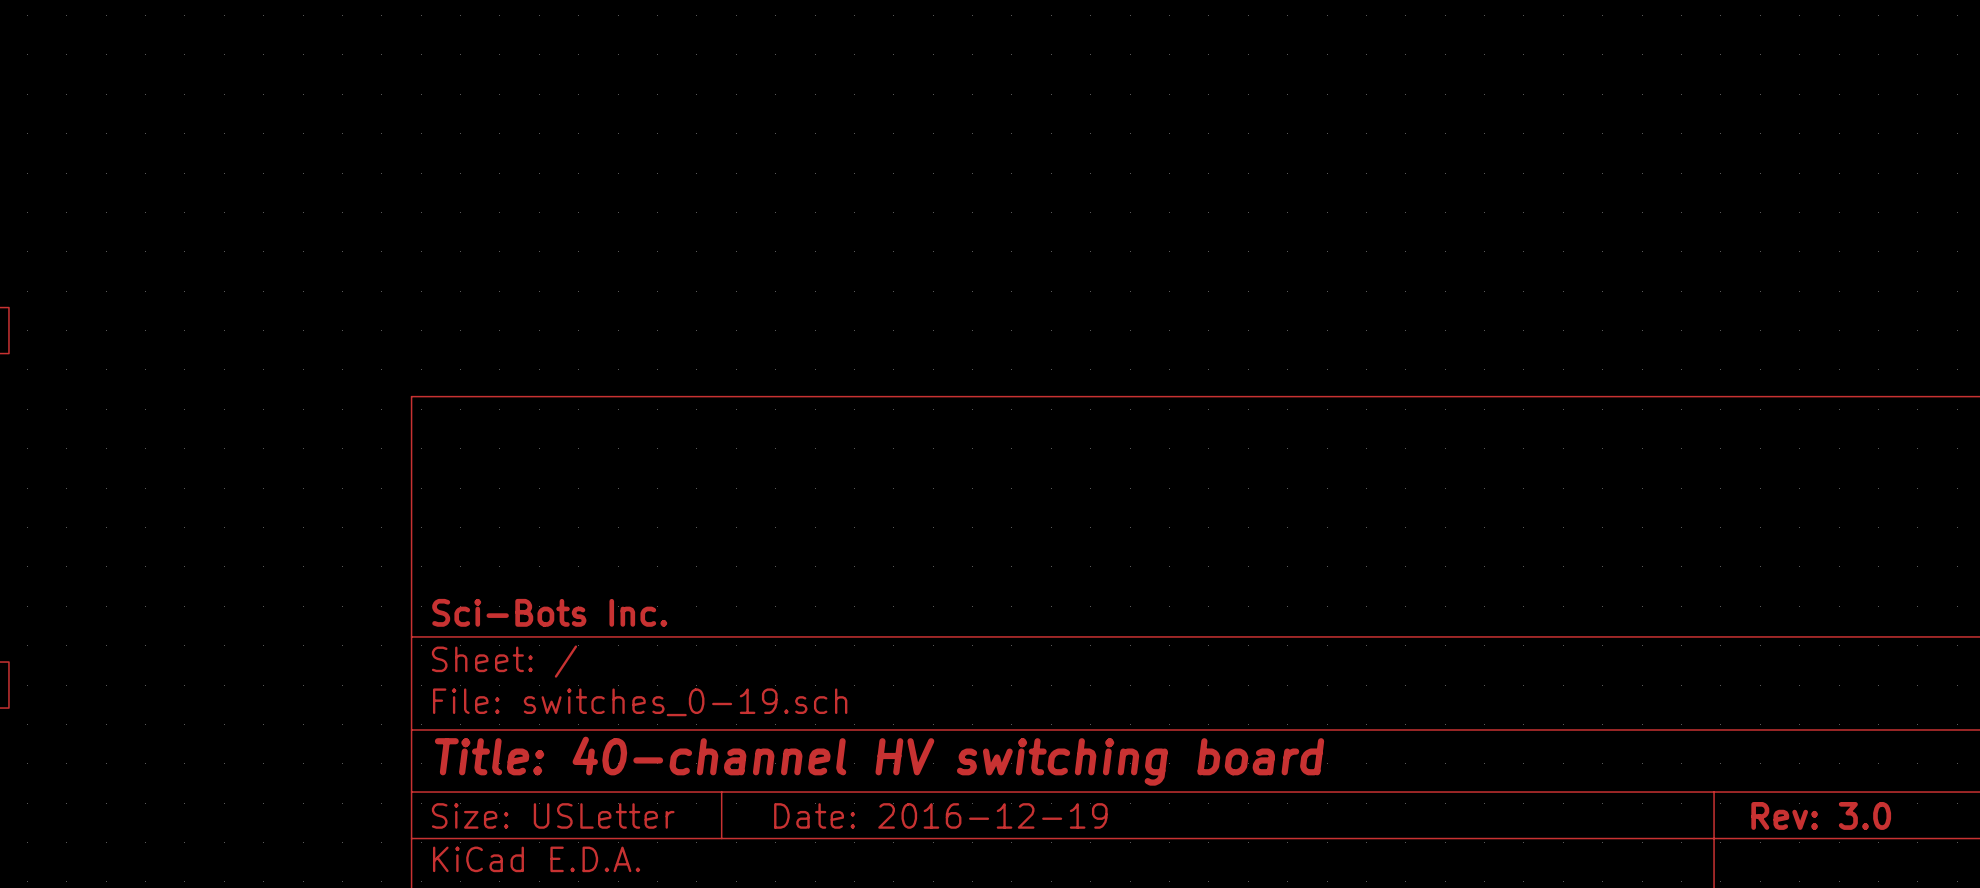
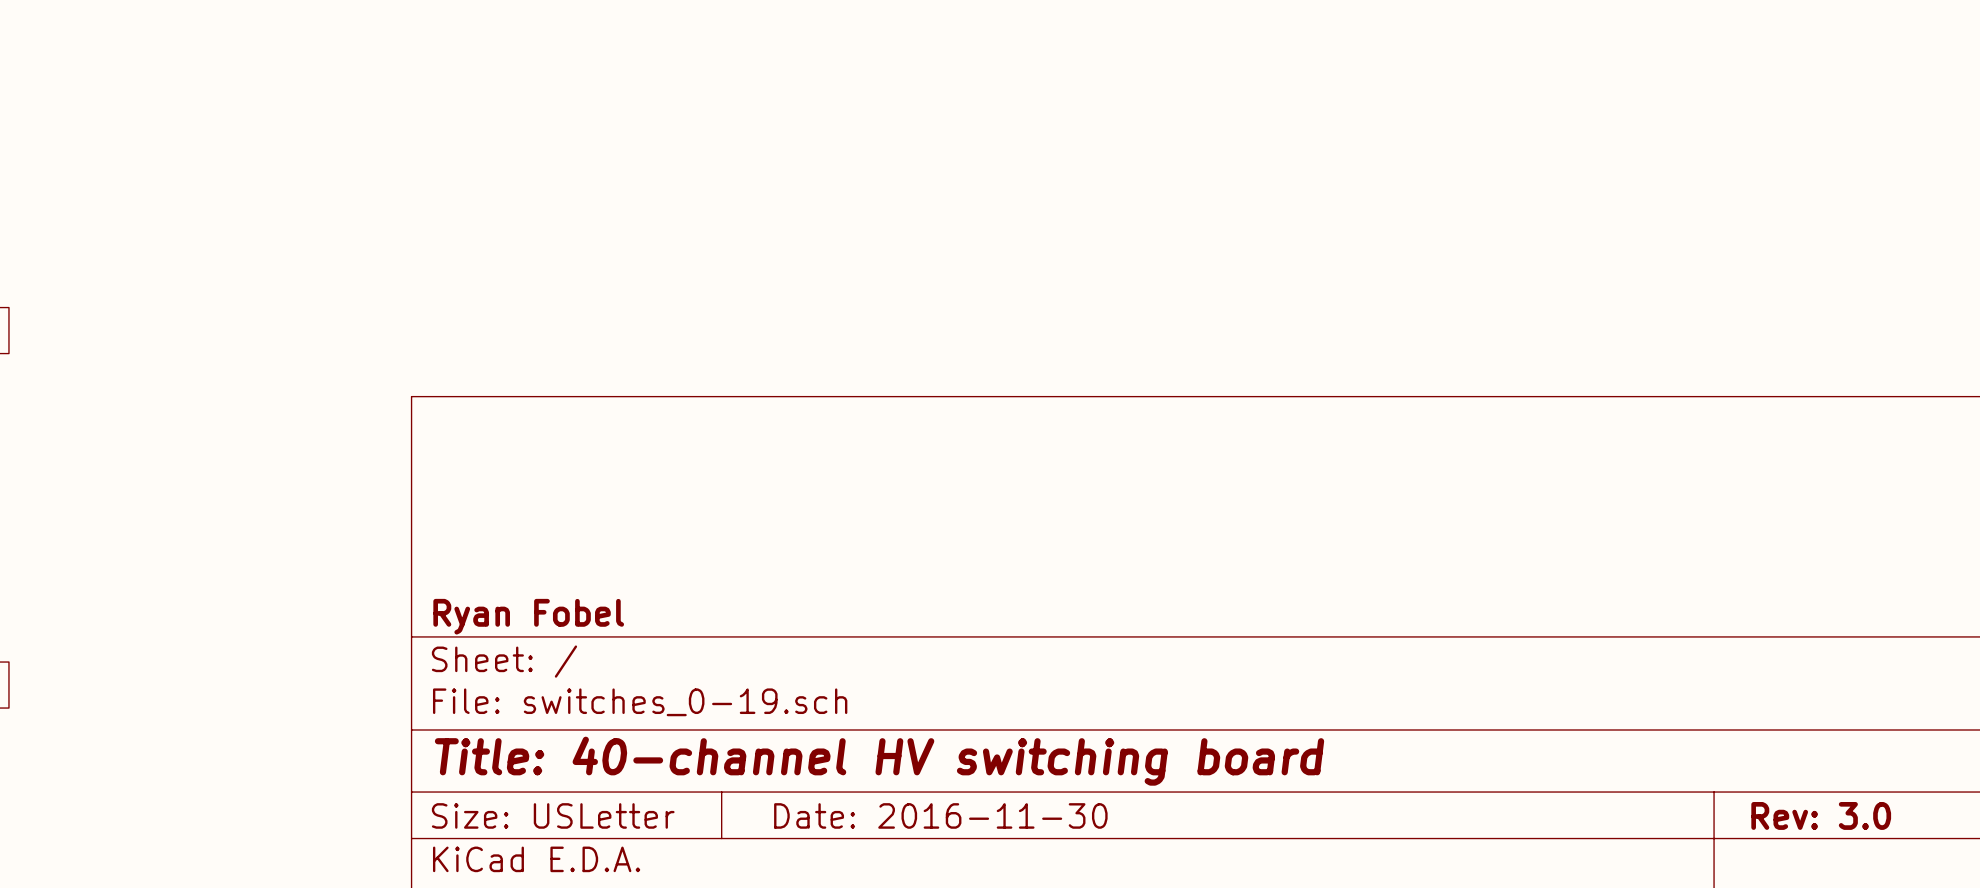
title block: Sci-Bots Inc. (549, 612) -> Ryan Fobel (528, 616)
title block: Date: 2016-12-19 (940, 815) -> Date: 2016-11-30 (940, 815)

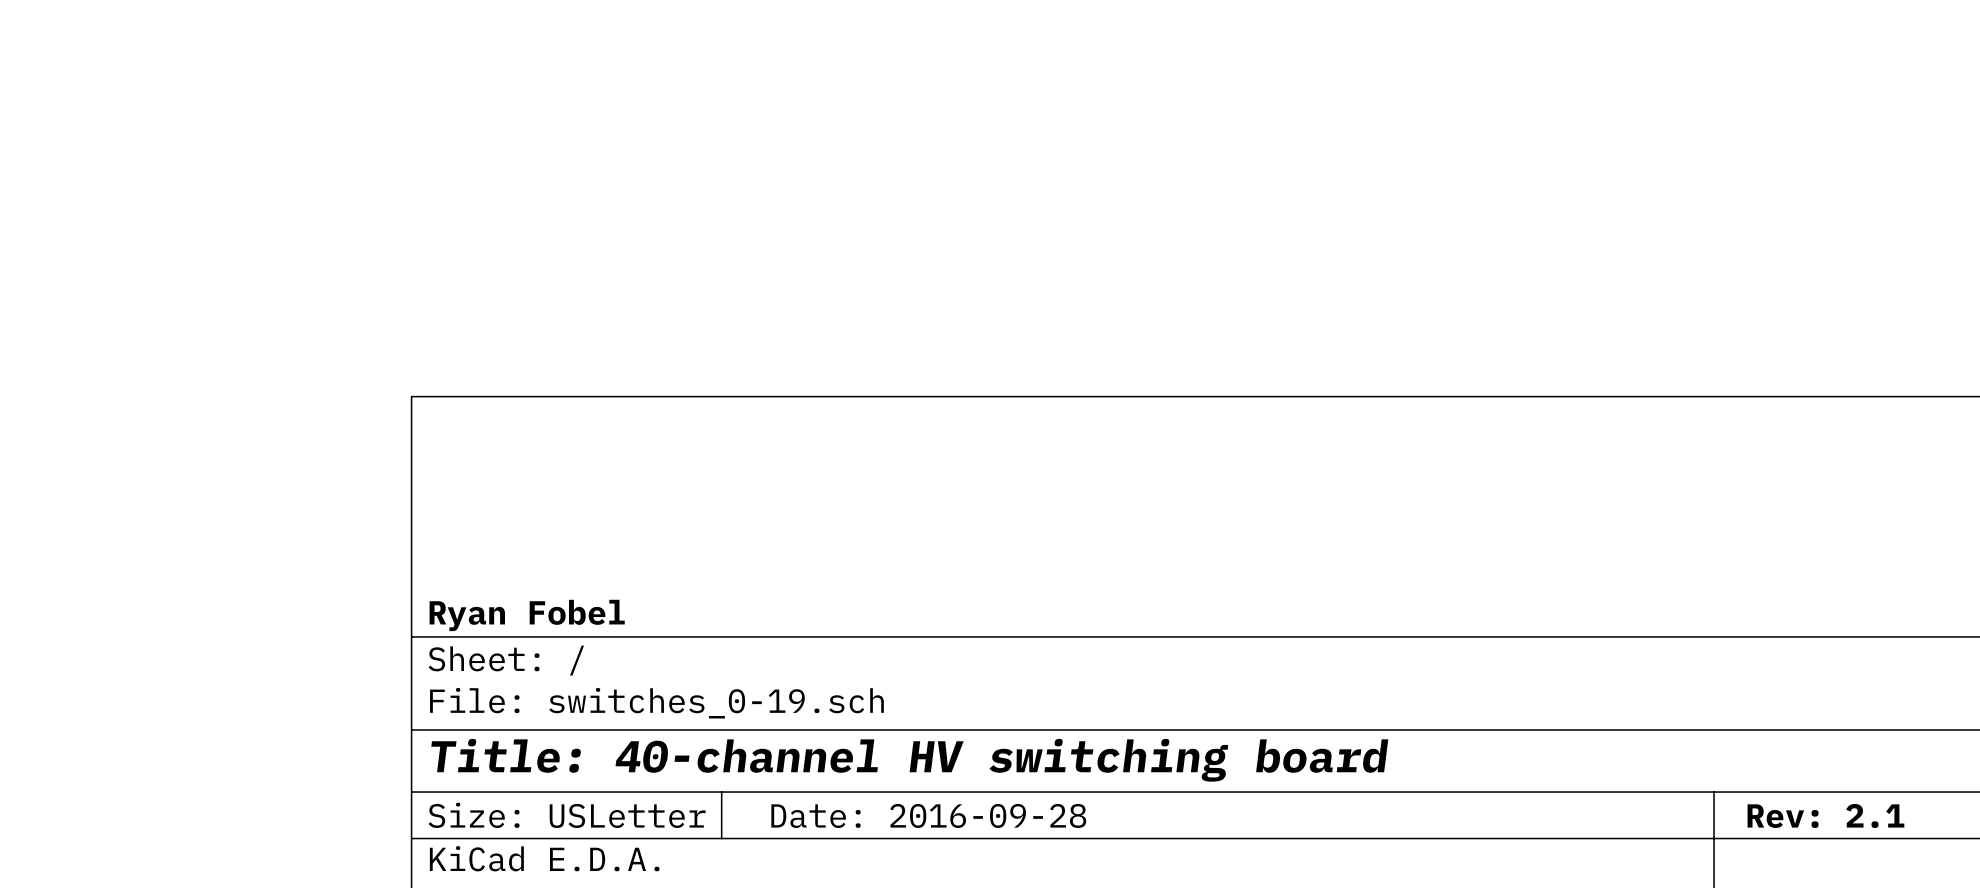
title block: Date: 2016-11-30 (940, 815) -> Date: 2016-09-28 (928, 815)
title block: Rev: 3.0 (1821, 815) -> Rev: 2.1 (1825, 815)

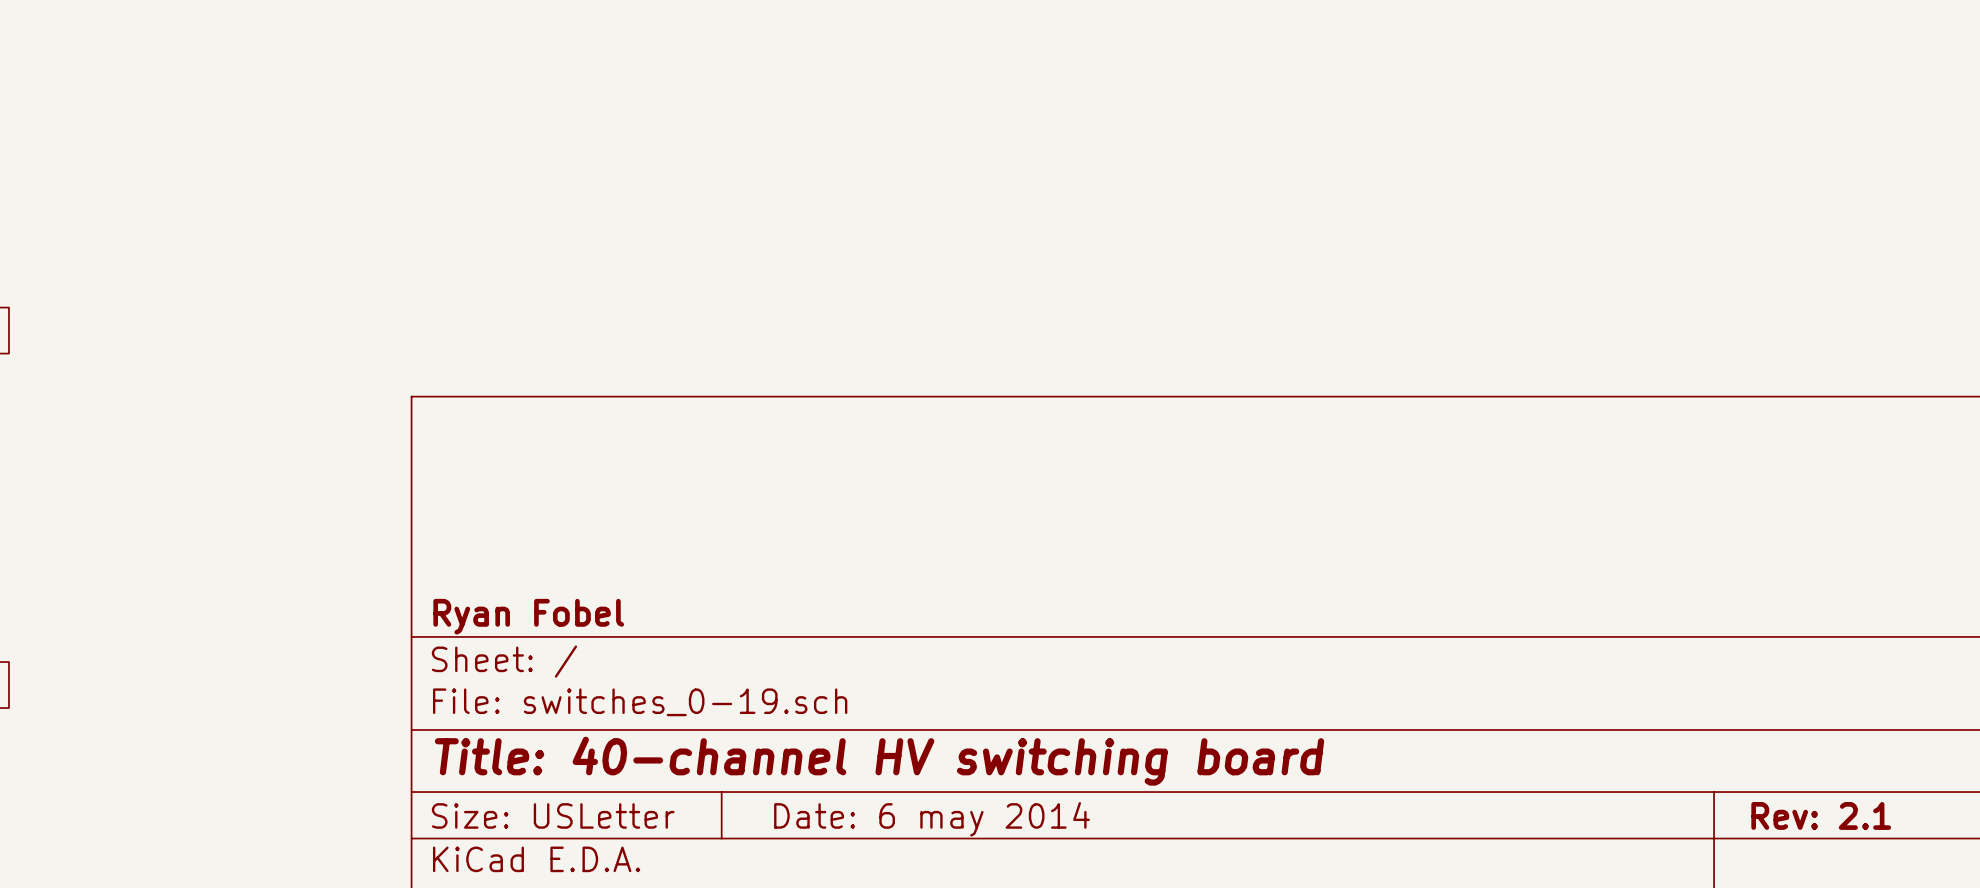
title block: Date: 2016-09-28 (928, 815) -> Date: 6 may 2014 (932, 819)

